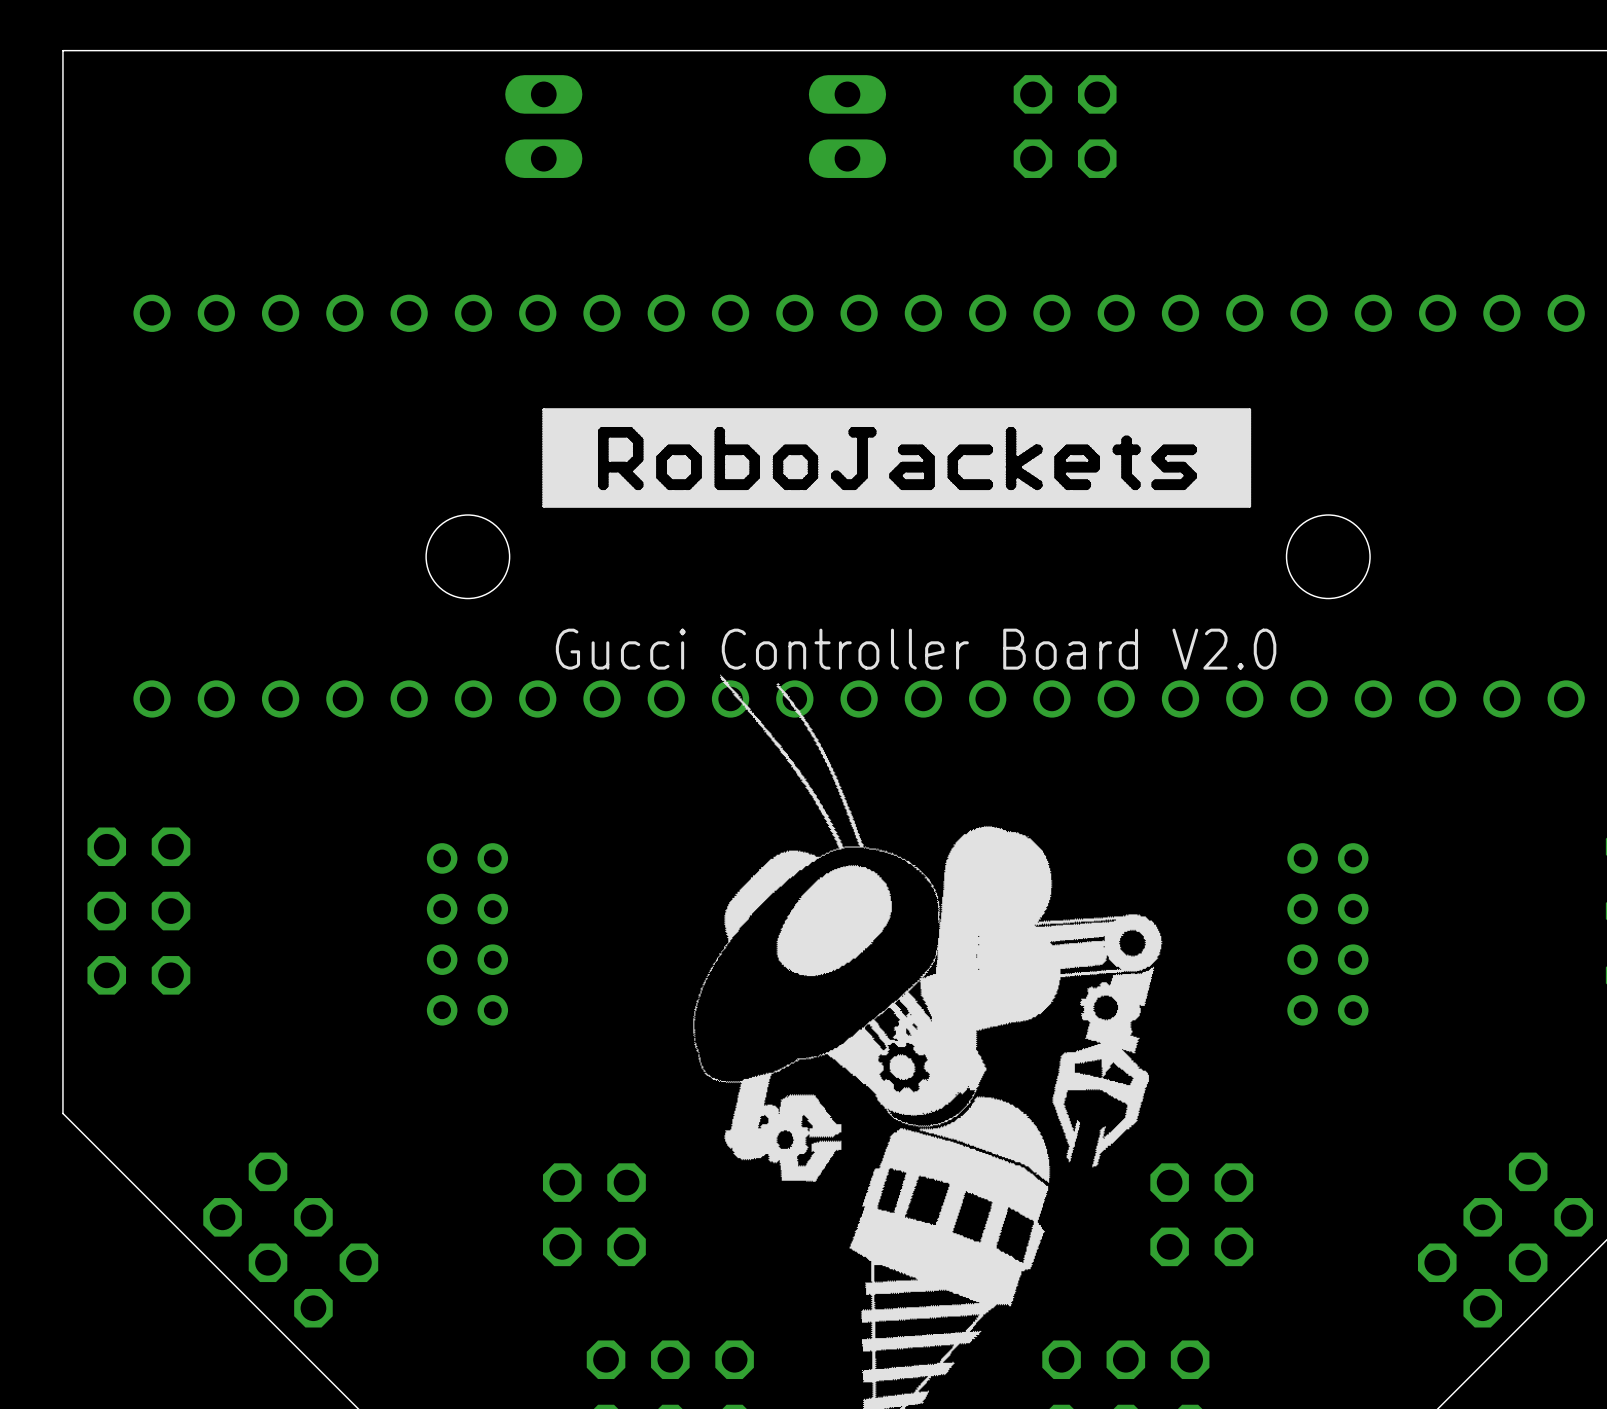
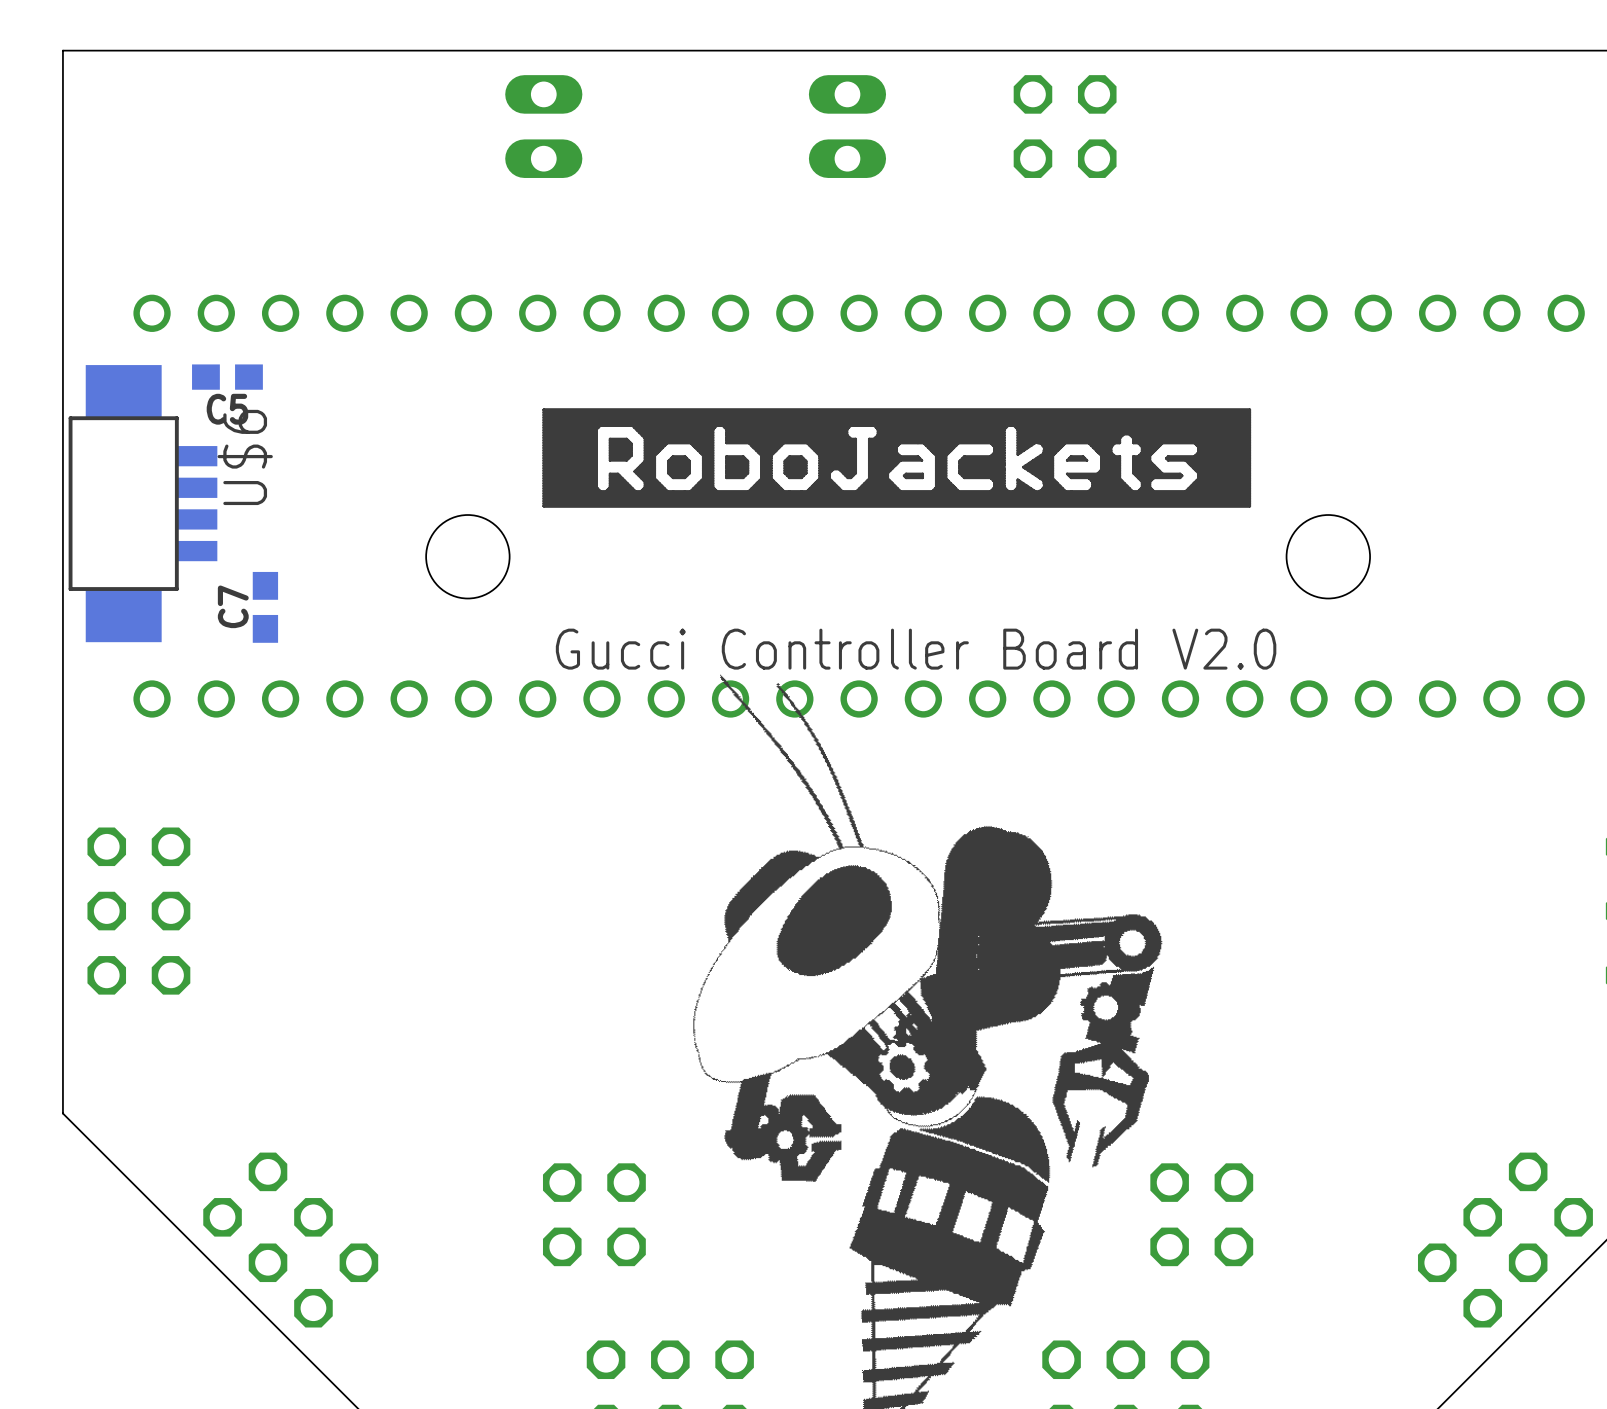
C5: none -> (227, 377)
U$6: none -> (142, 503)
C7: none -> (265, 607)
part: (467, 934) -> none
part: (1327, 934) -> none

